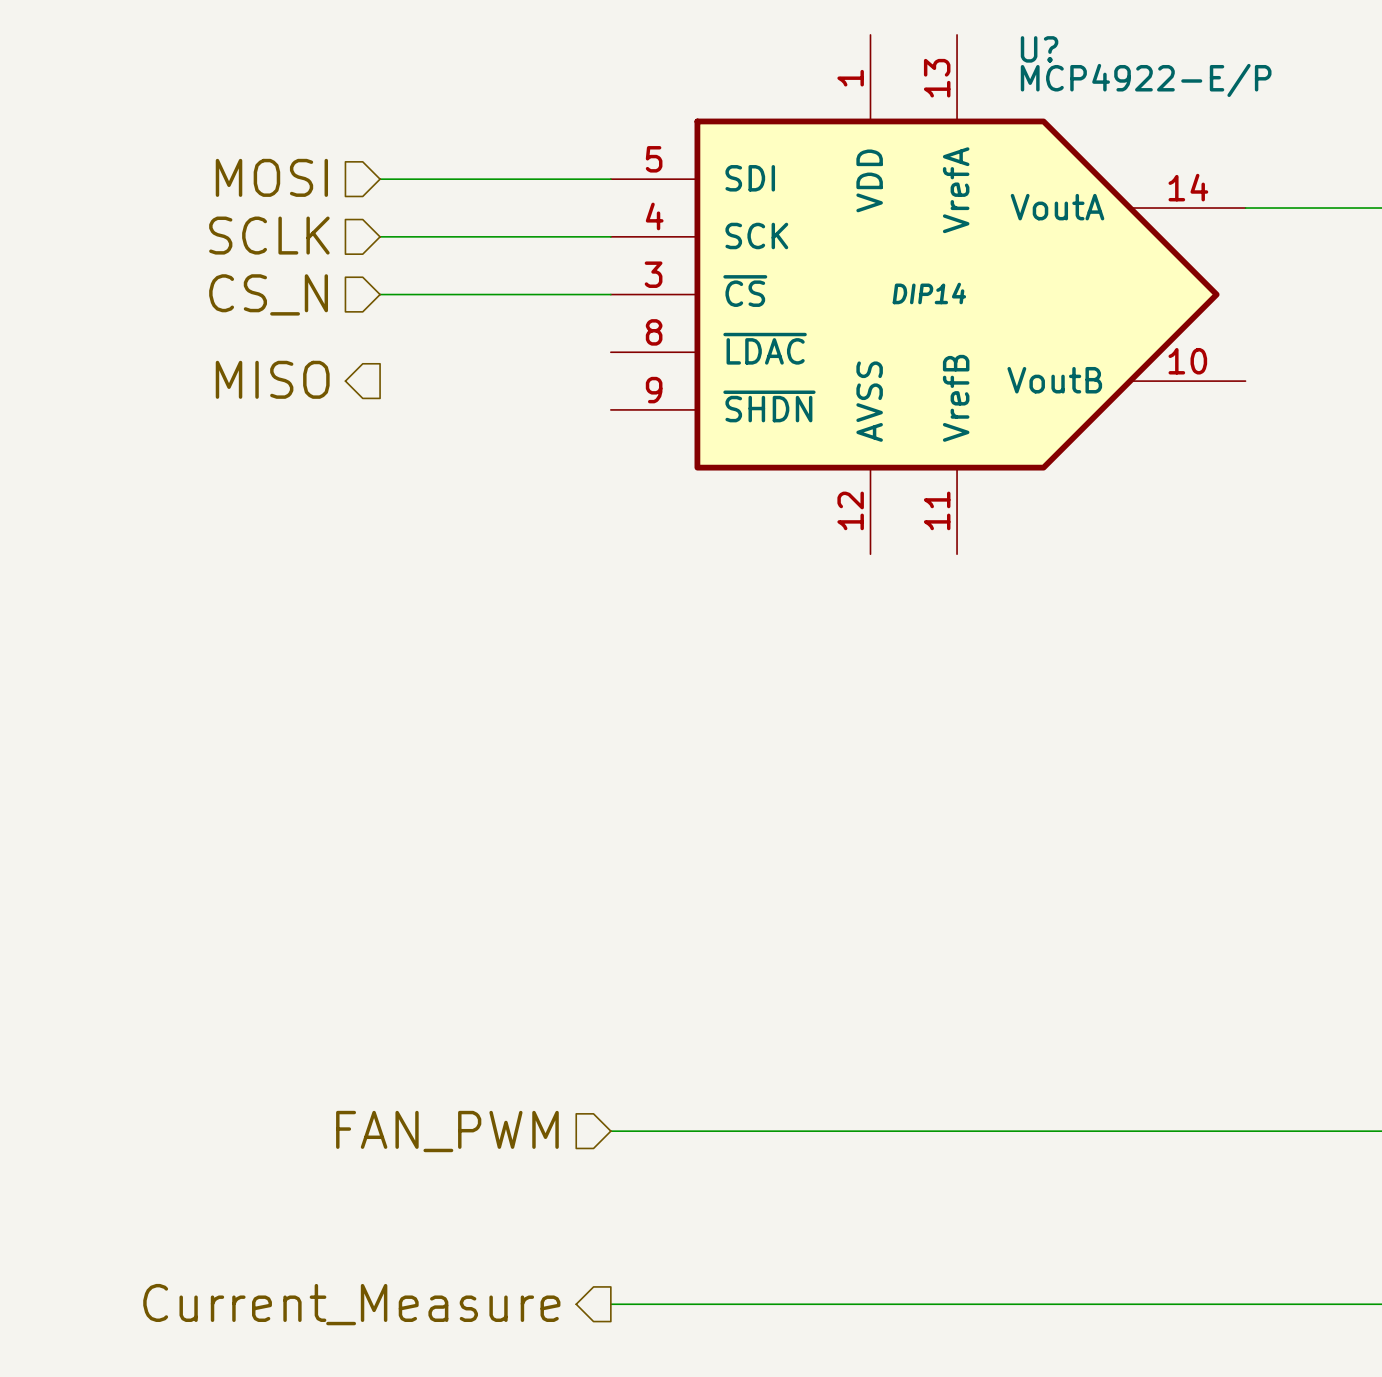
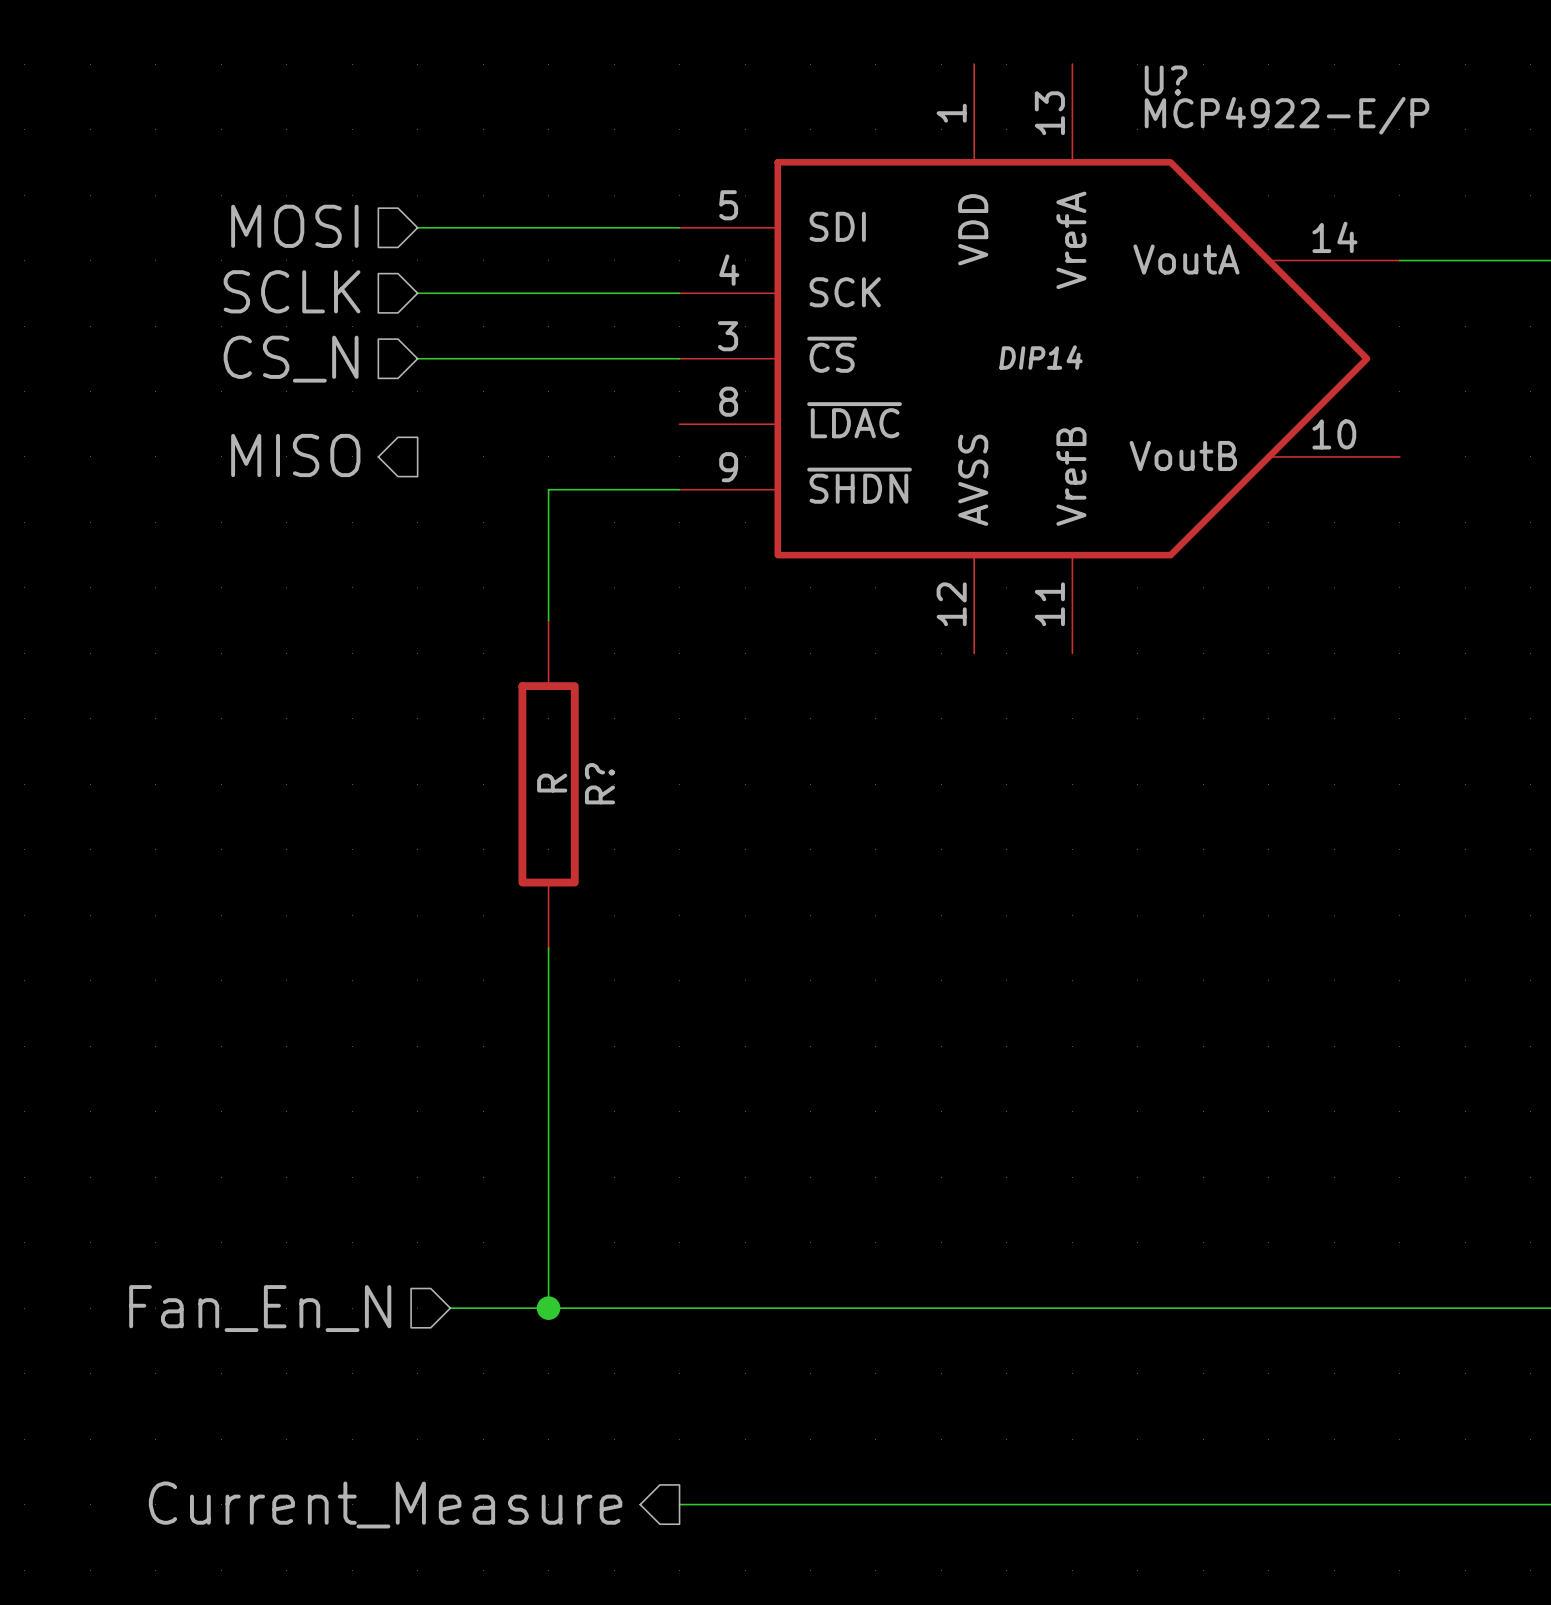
wire: none -> (679, 489) (548, 489) (548, 620)
R?: none -> R (548, 784)
wire: none -> (548, 948) (548, 1308)
hierarchical label: none -> Fan_En_N (260, 1308)
wire: none -> (450, 1308) (679, 1308)
hierarchical label: FAN_PWM (447, 1131) -> none
junction: none -> (548, 1308)

